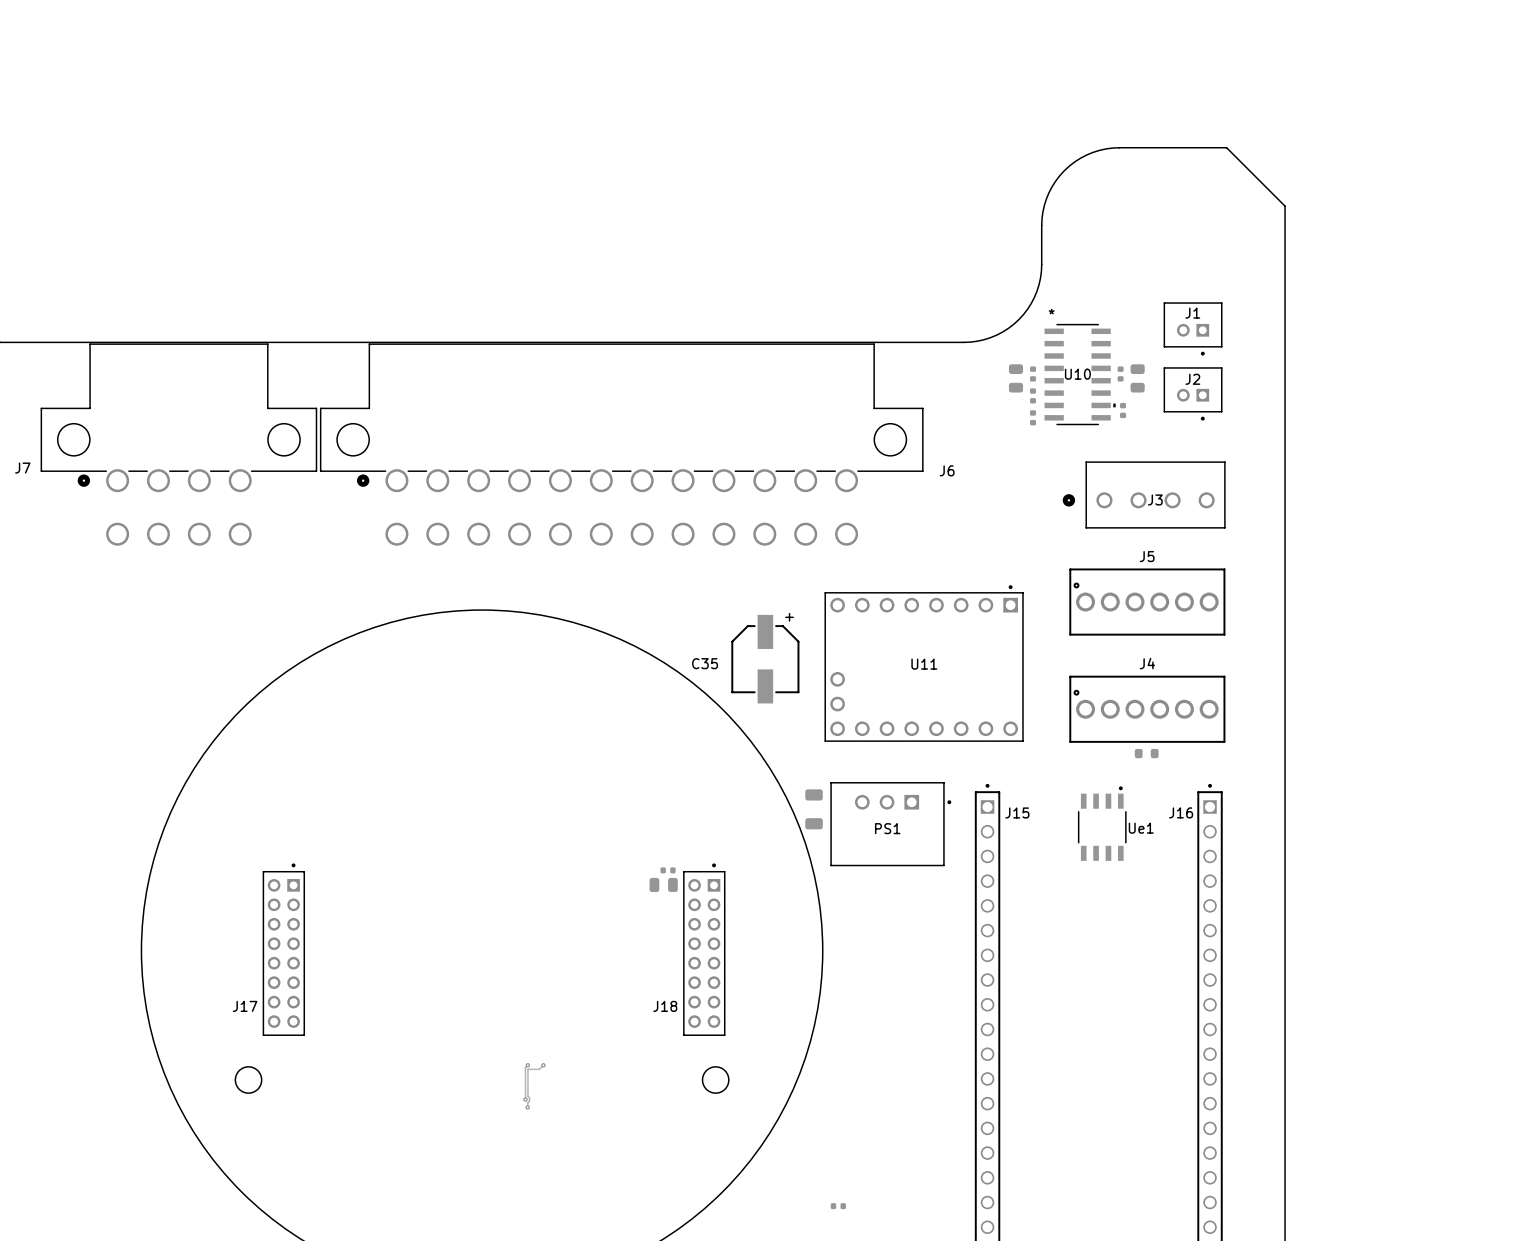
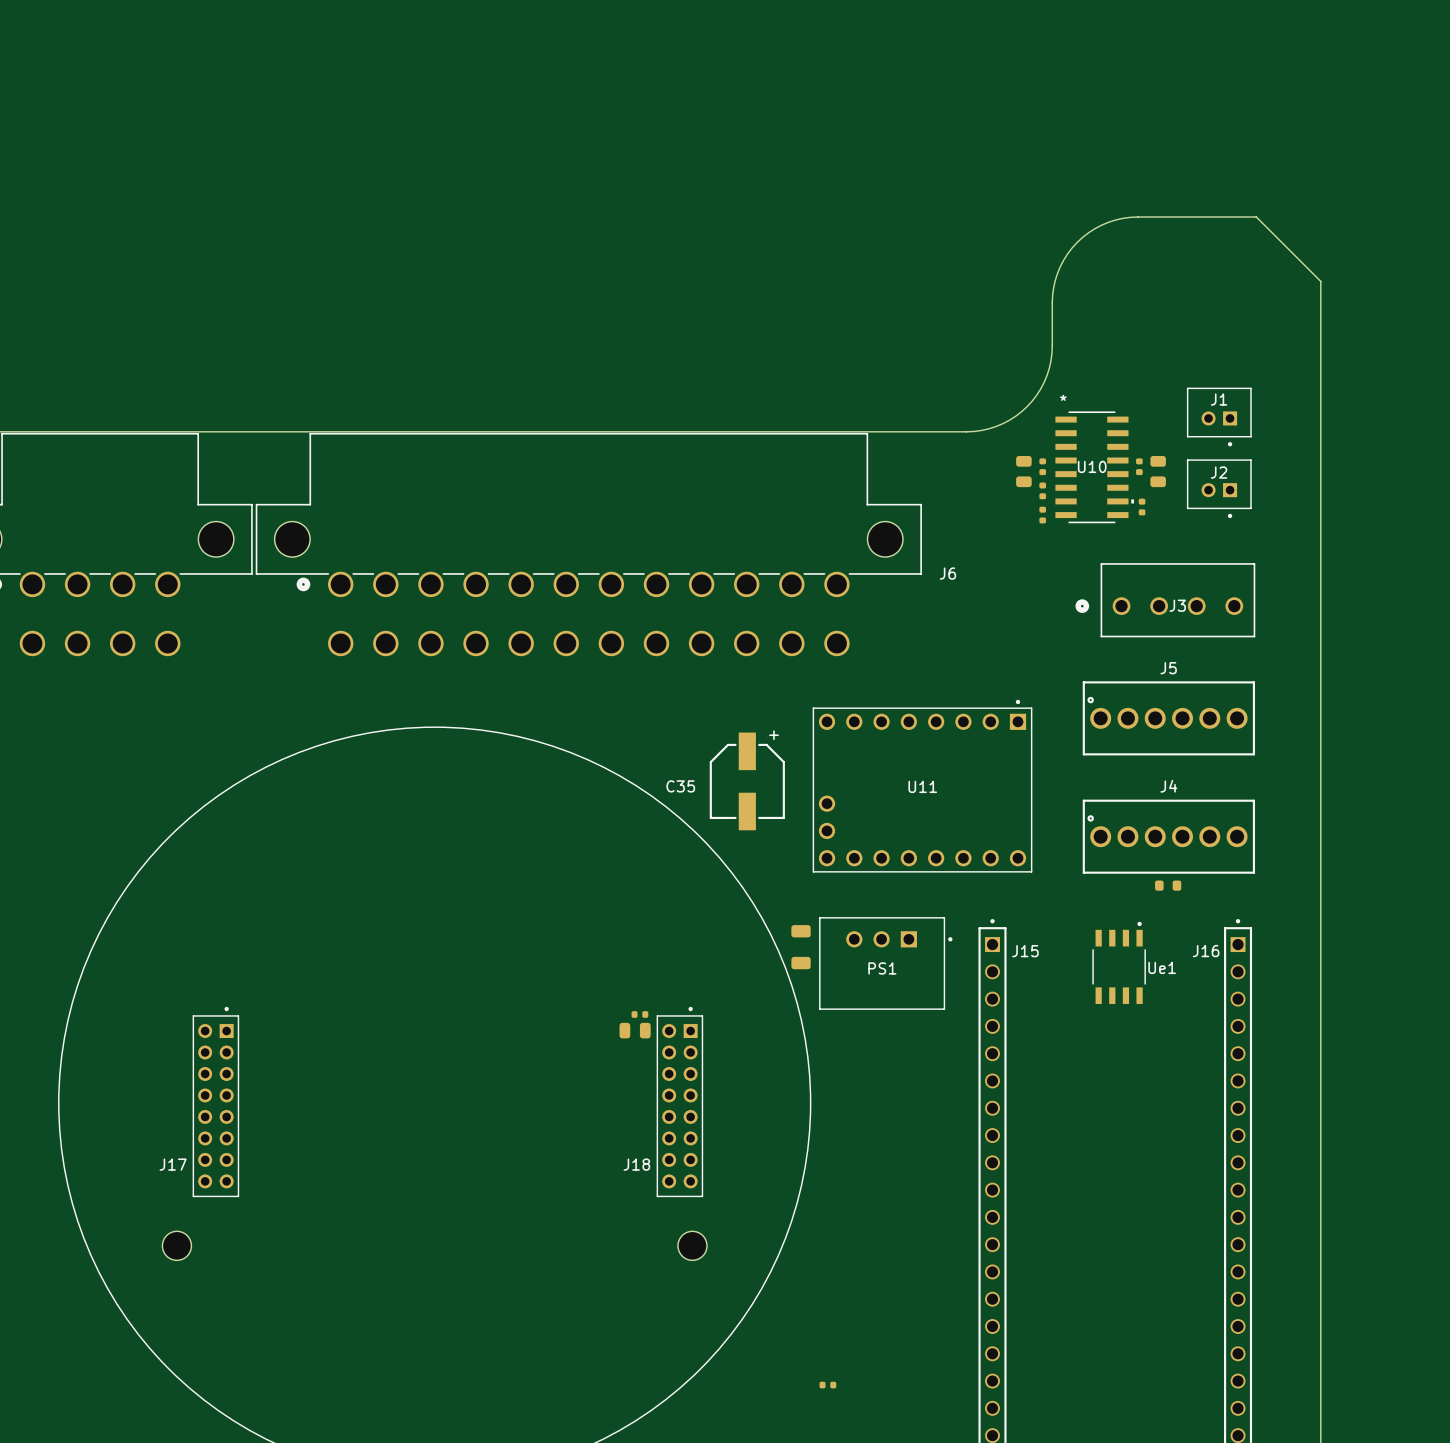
track: (527, 1065) (525, 1067) (525, 1099) -> none
via: (527, 1065) -> none
track: (543, 1065) (539, 1069) (527, 1069) (529, 1101) (527, 1107) -> none
via: (543, 1065) -> none
via: (525, 1099) -> none
via: (527, 1107) -> none

